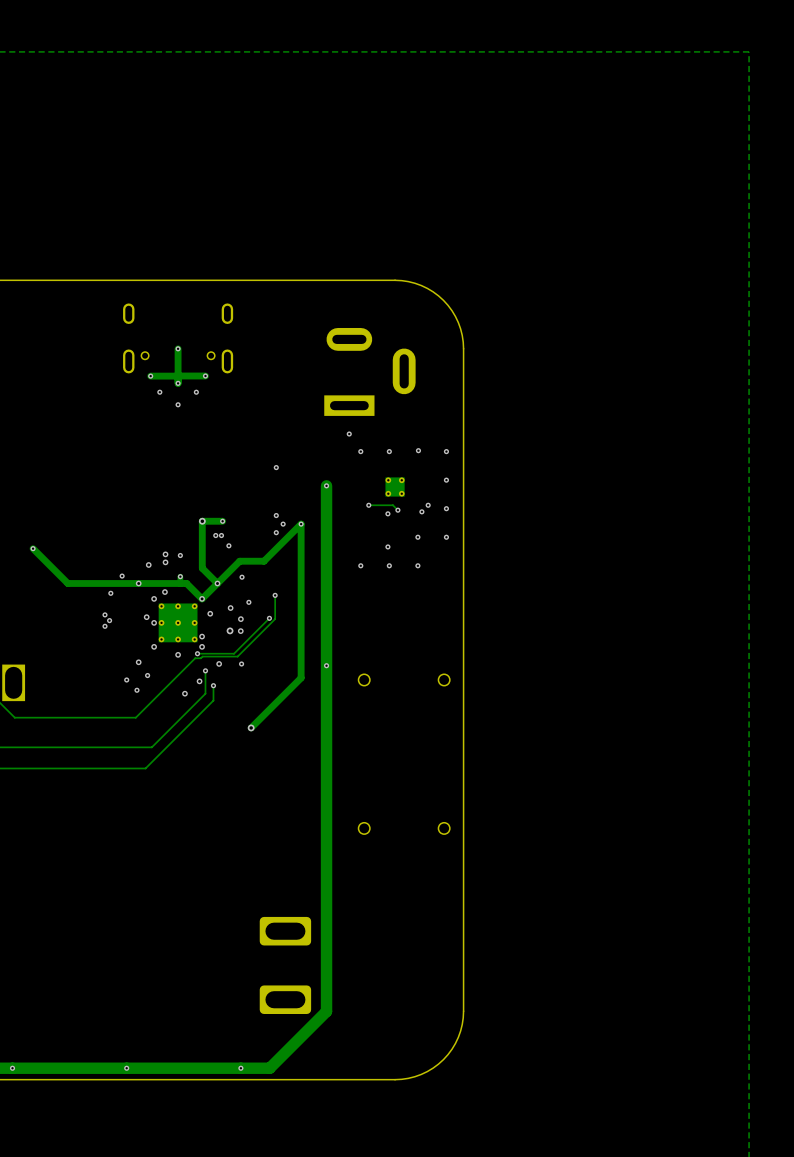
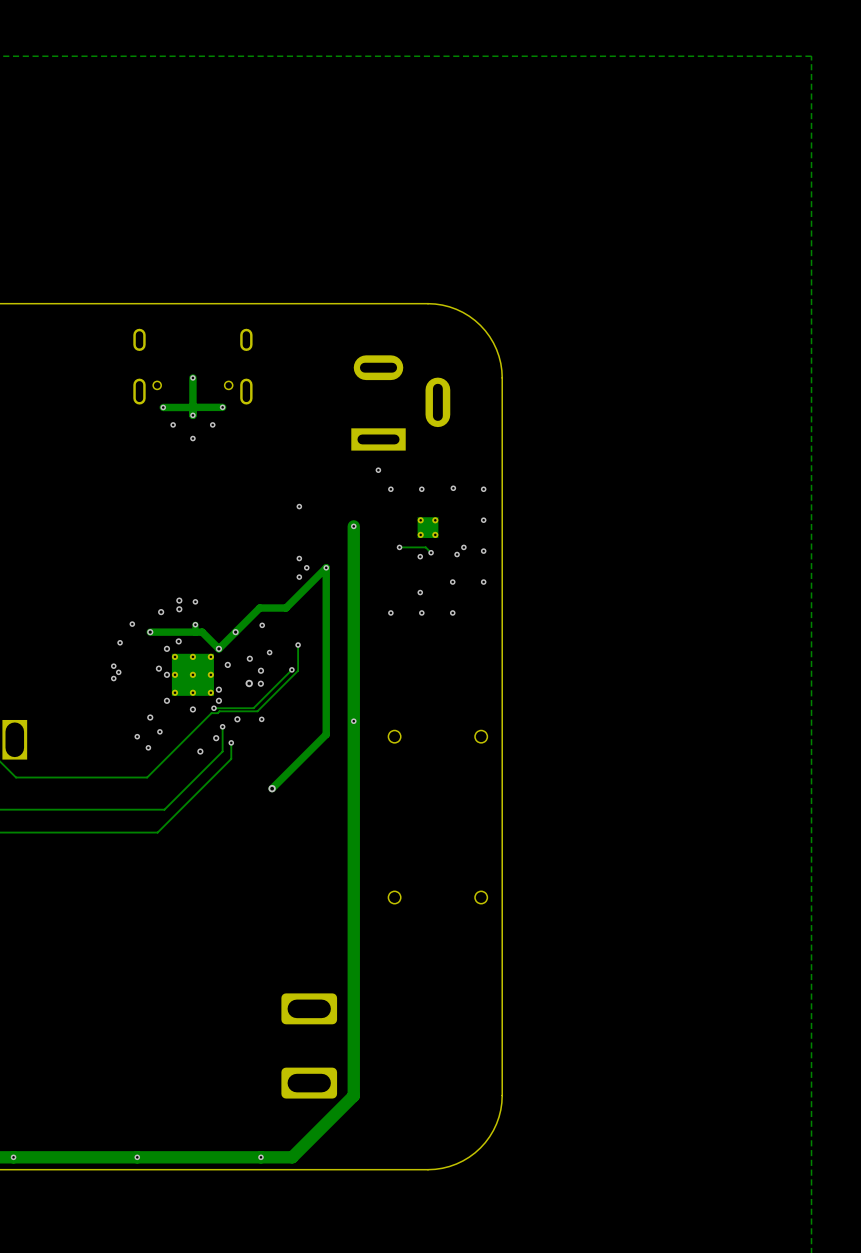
track: (202, 521) (202, 568) (217, 583) -> none
via: (202, 521) -> none
track: (222, 521) (202, 521) -> none
via: (222, 521) -> none
via: (215, 535) -> none
via: (221, 535) -> none
via: (228, 545) -> none
track: (33, 548) (67, 583) (138, 583) -> none
via: (33, 548) -> none

